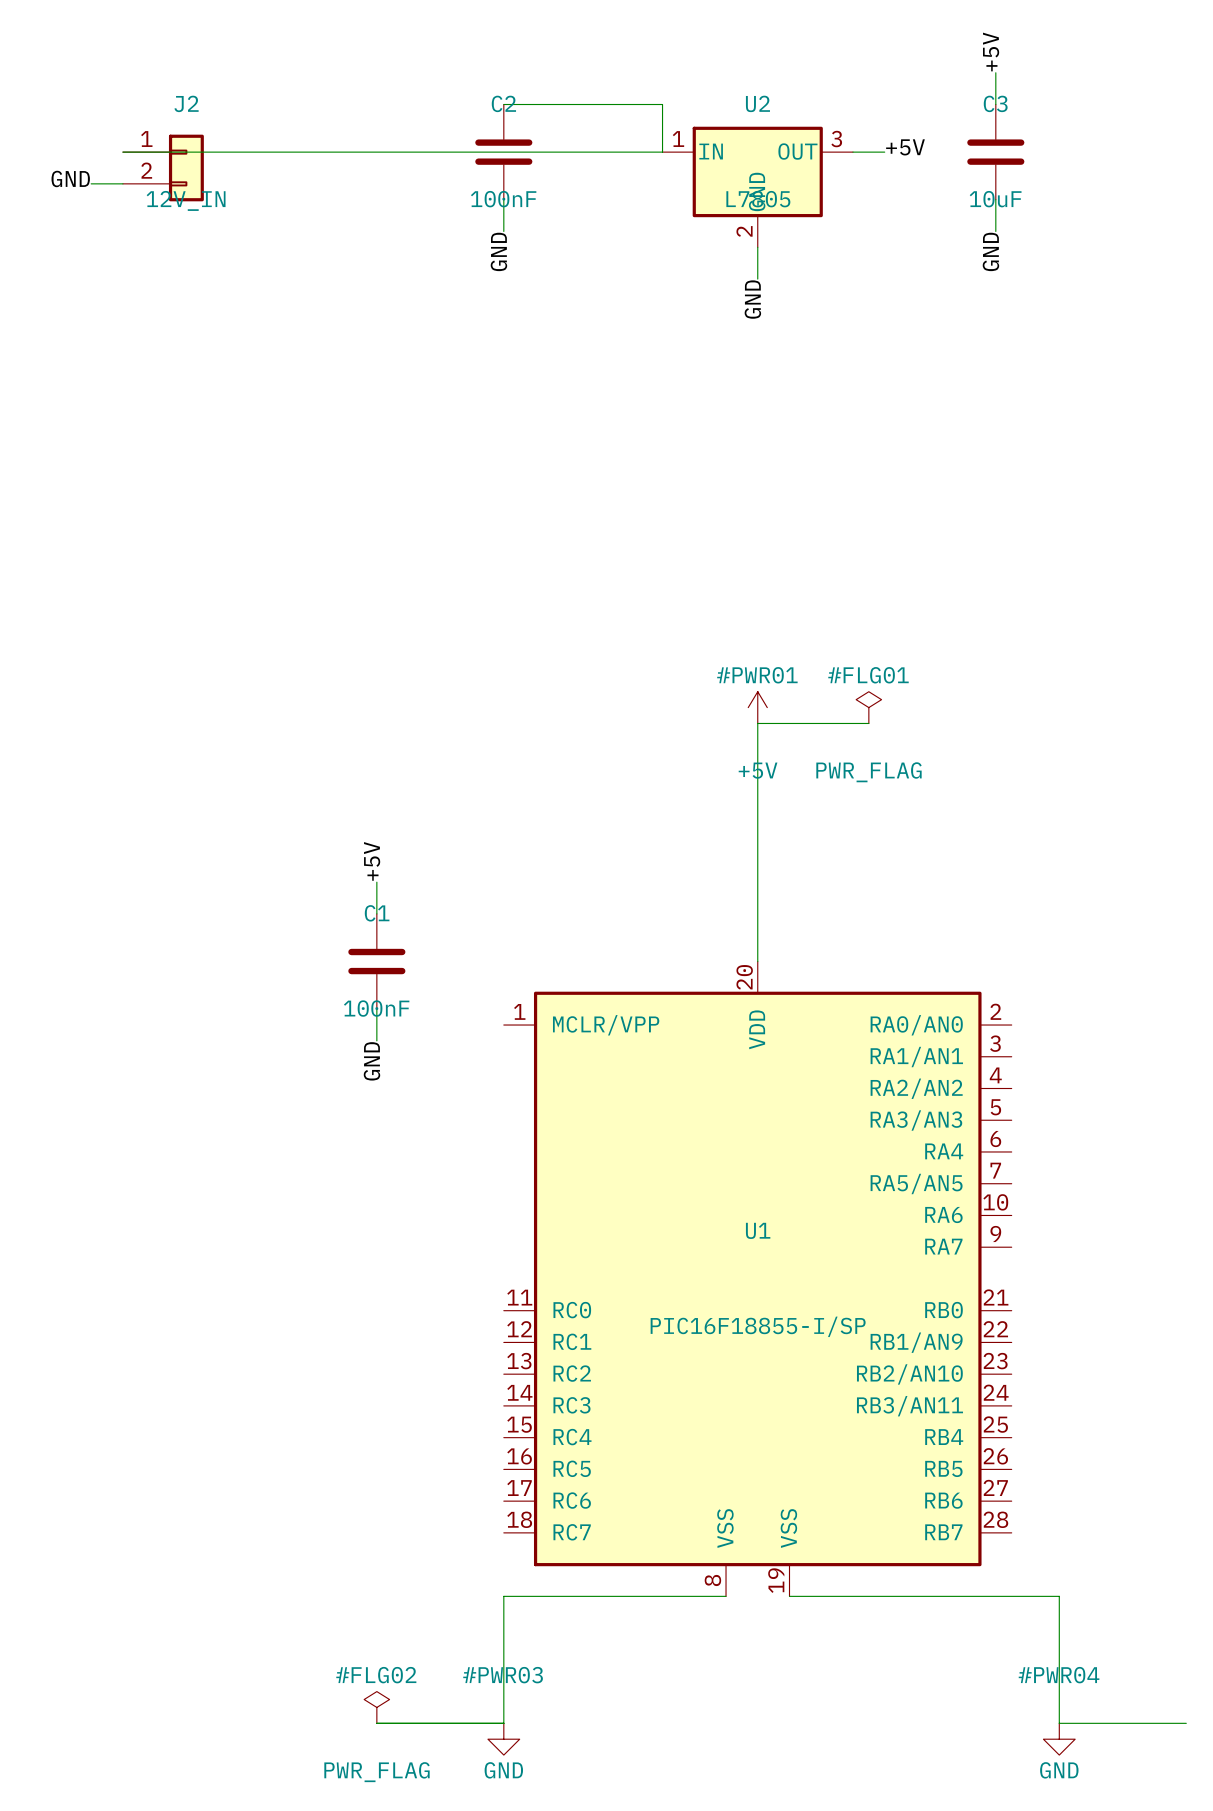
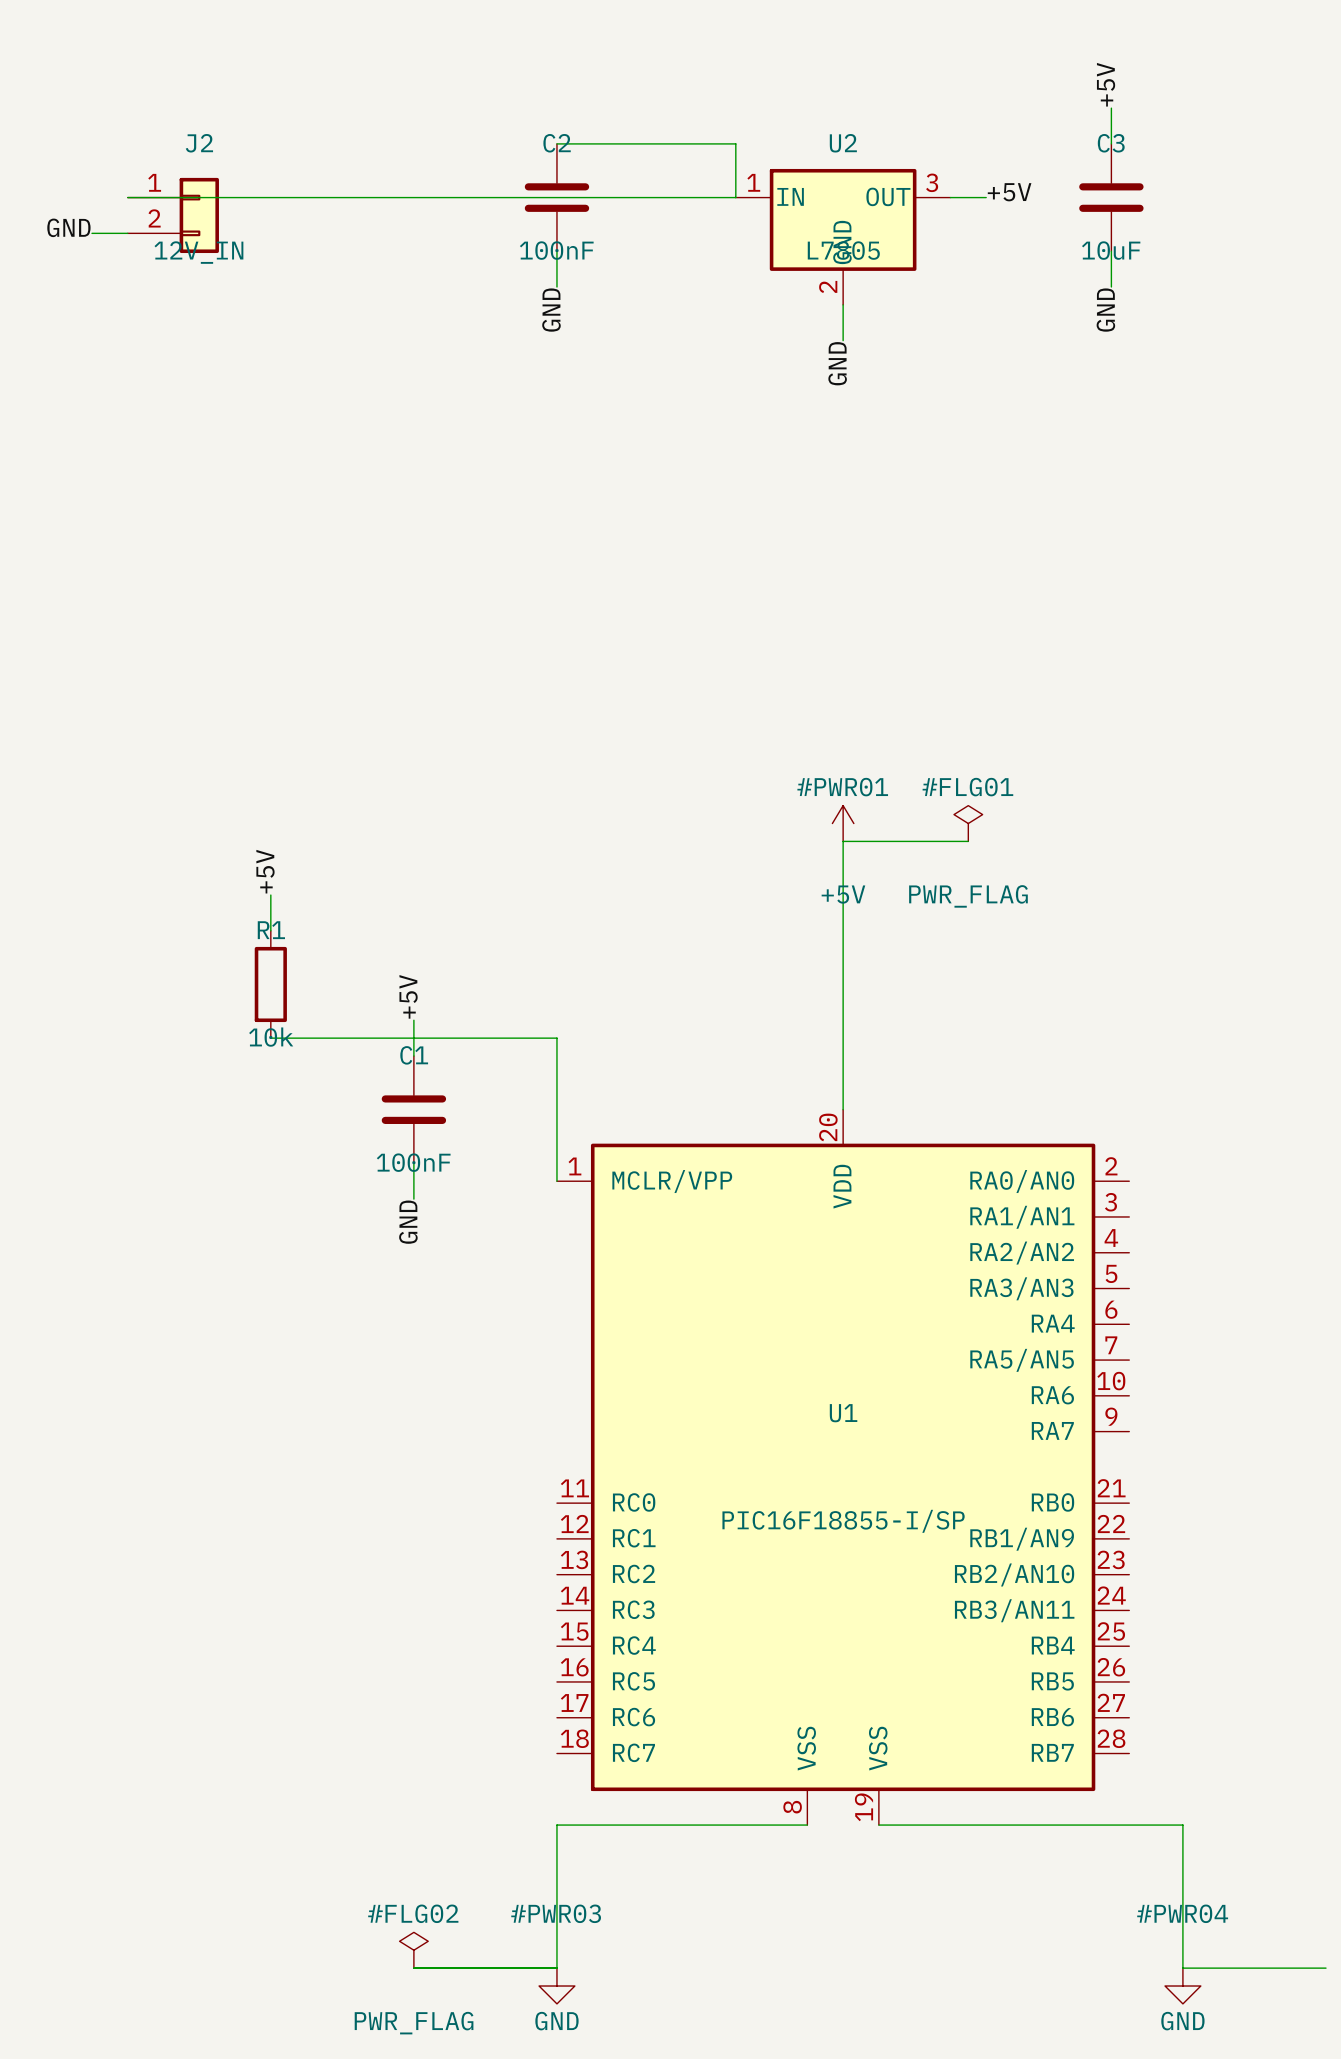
label: none -> +5V (265, 871)
wire: none -> (270, 895) (270, 930)
R1: none -> 10k (270, 984)
wire: none -> (270, 1038) (556, 1038) (556, 1181)

